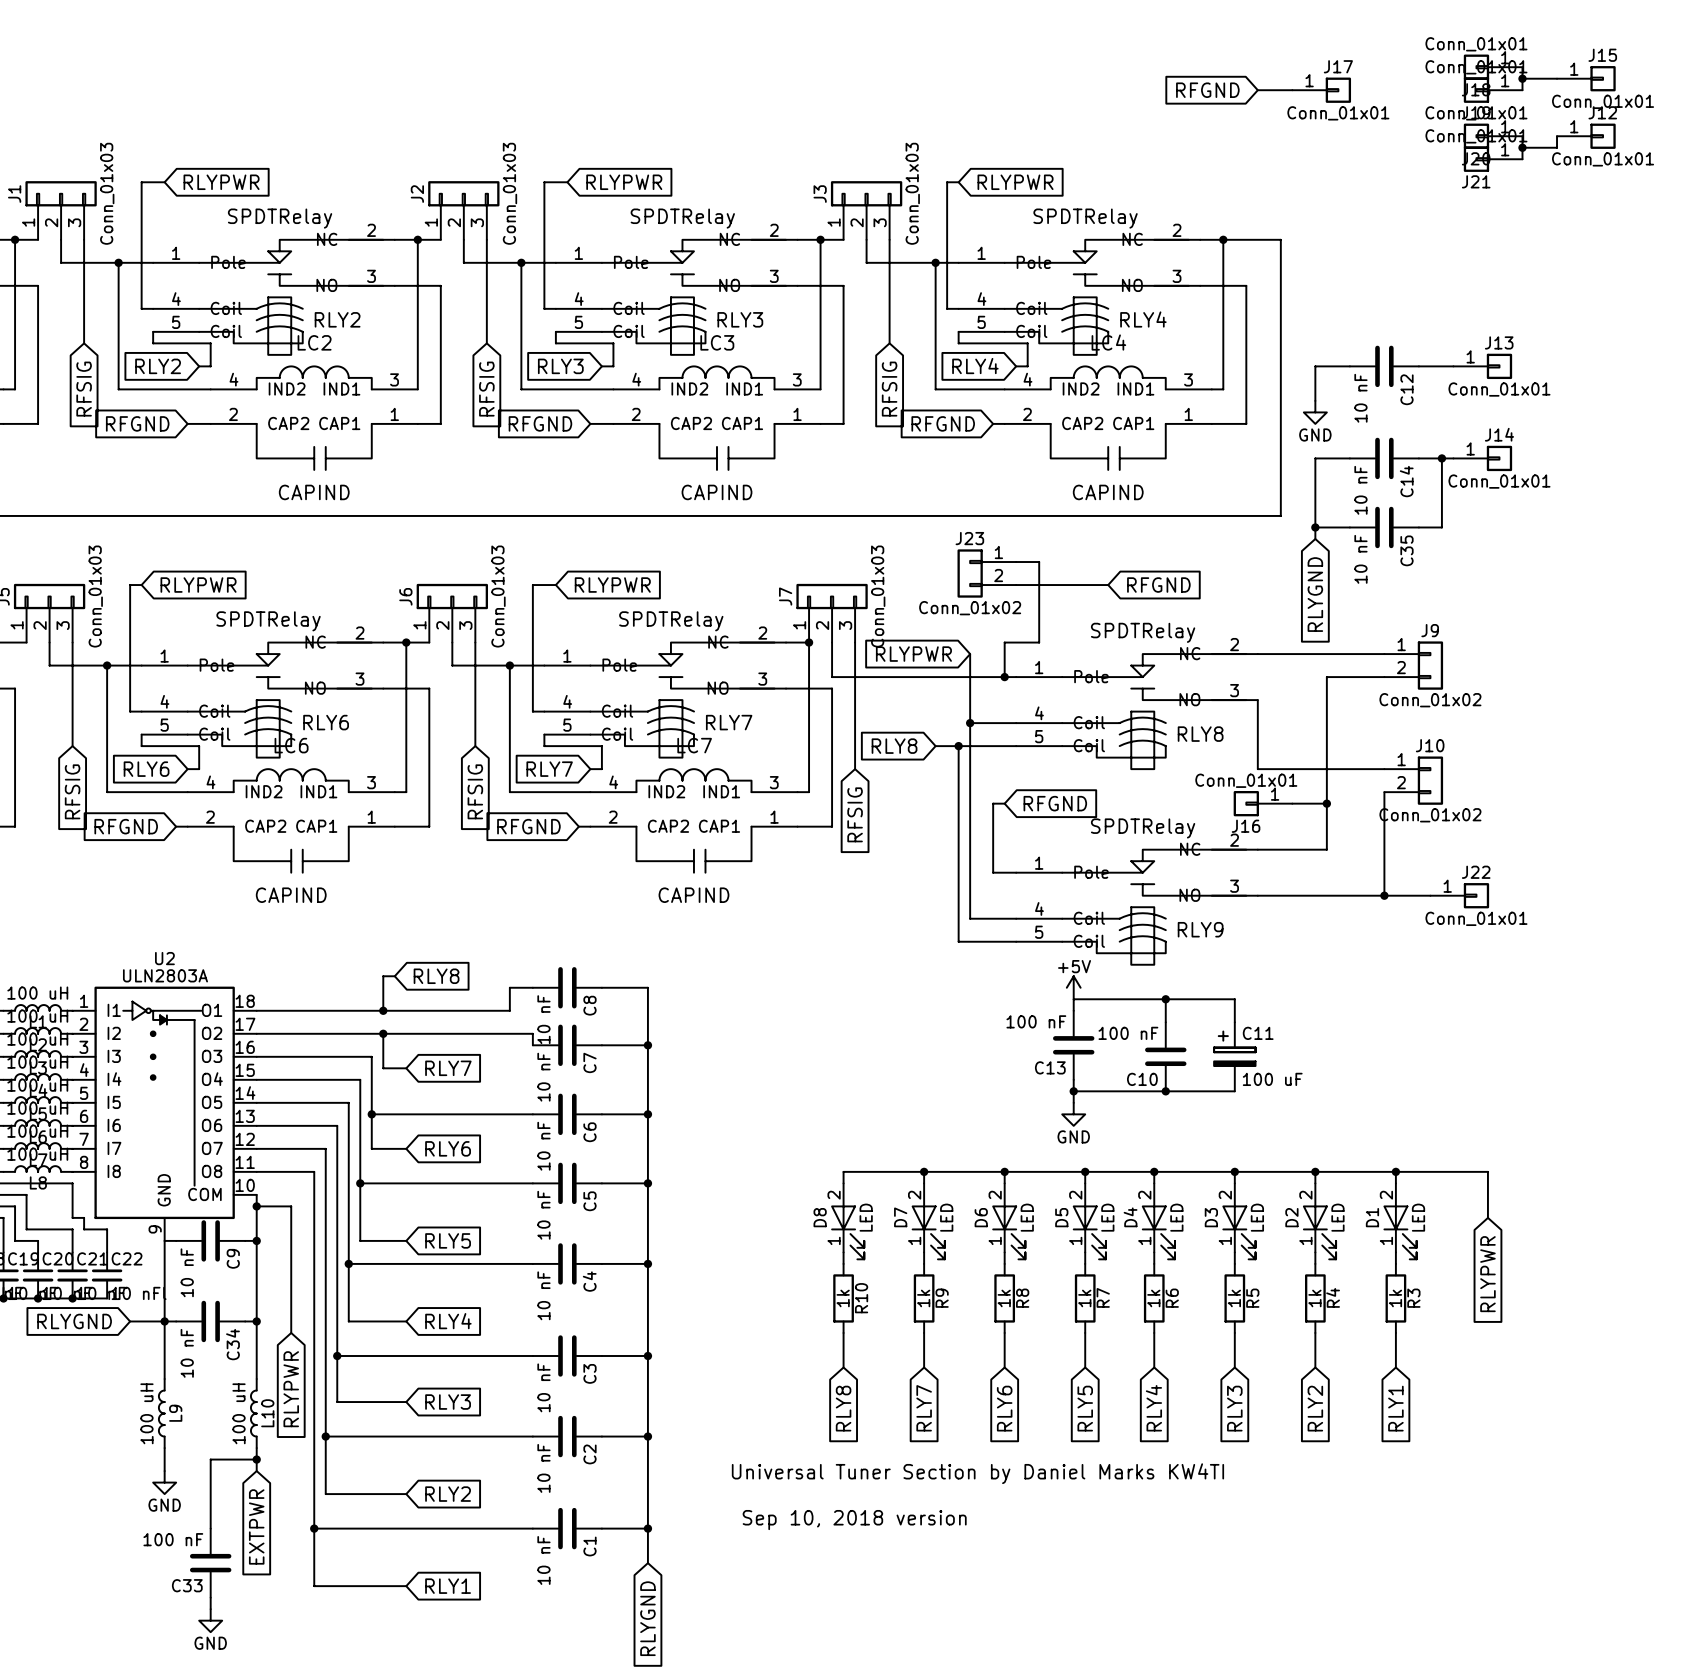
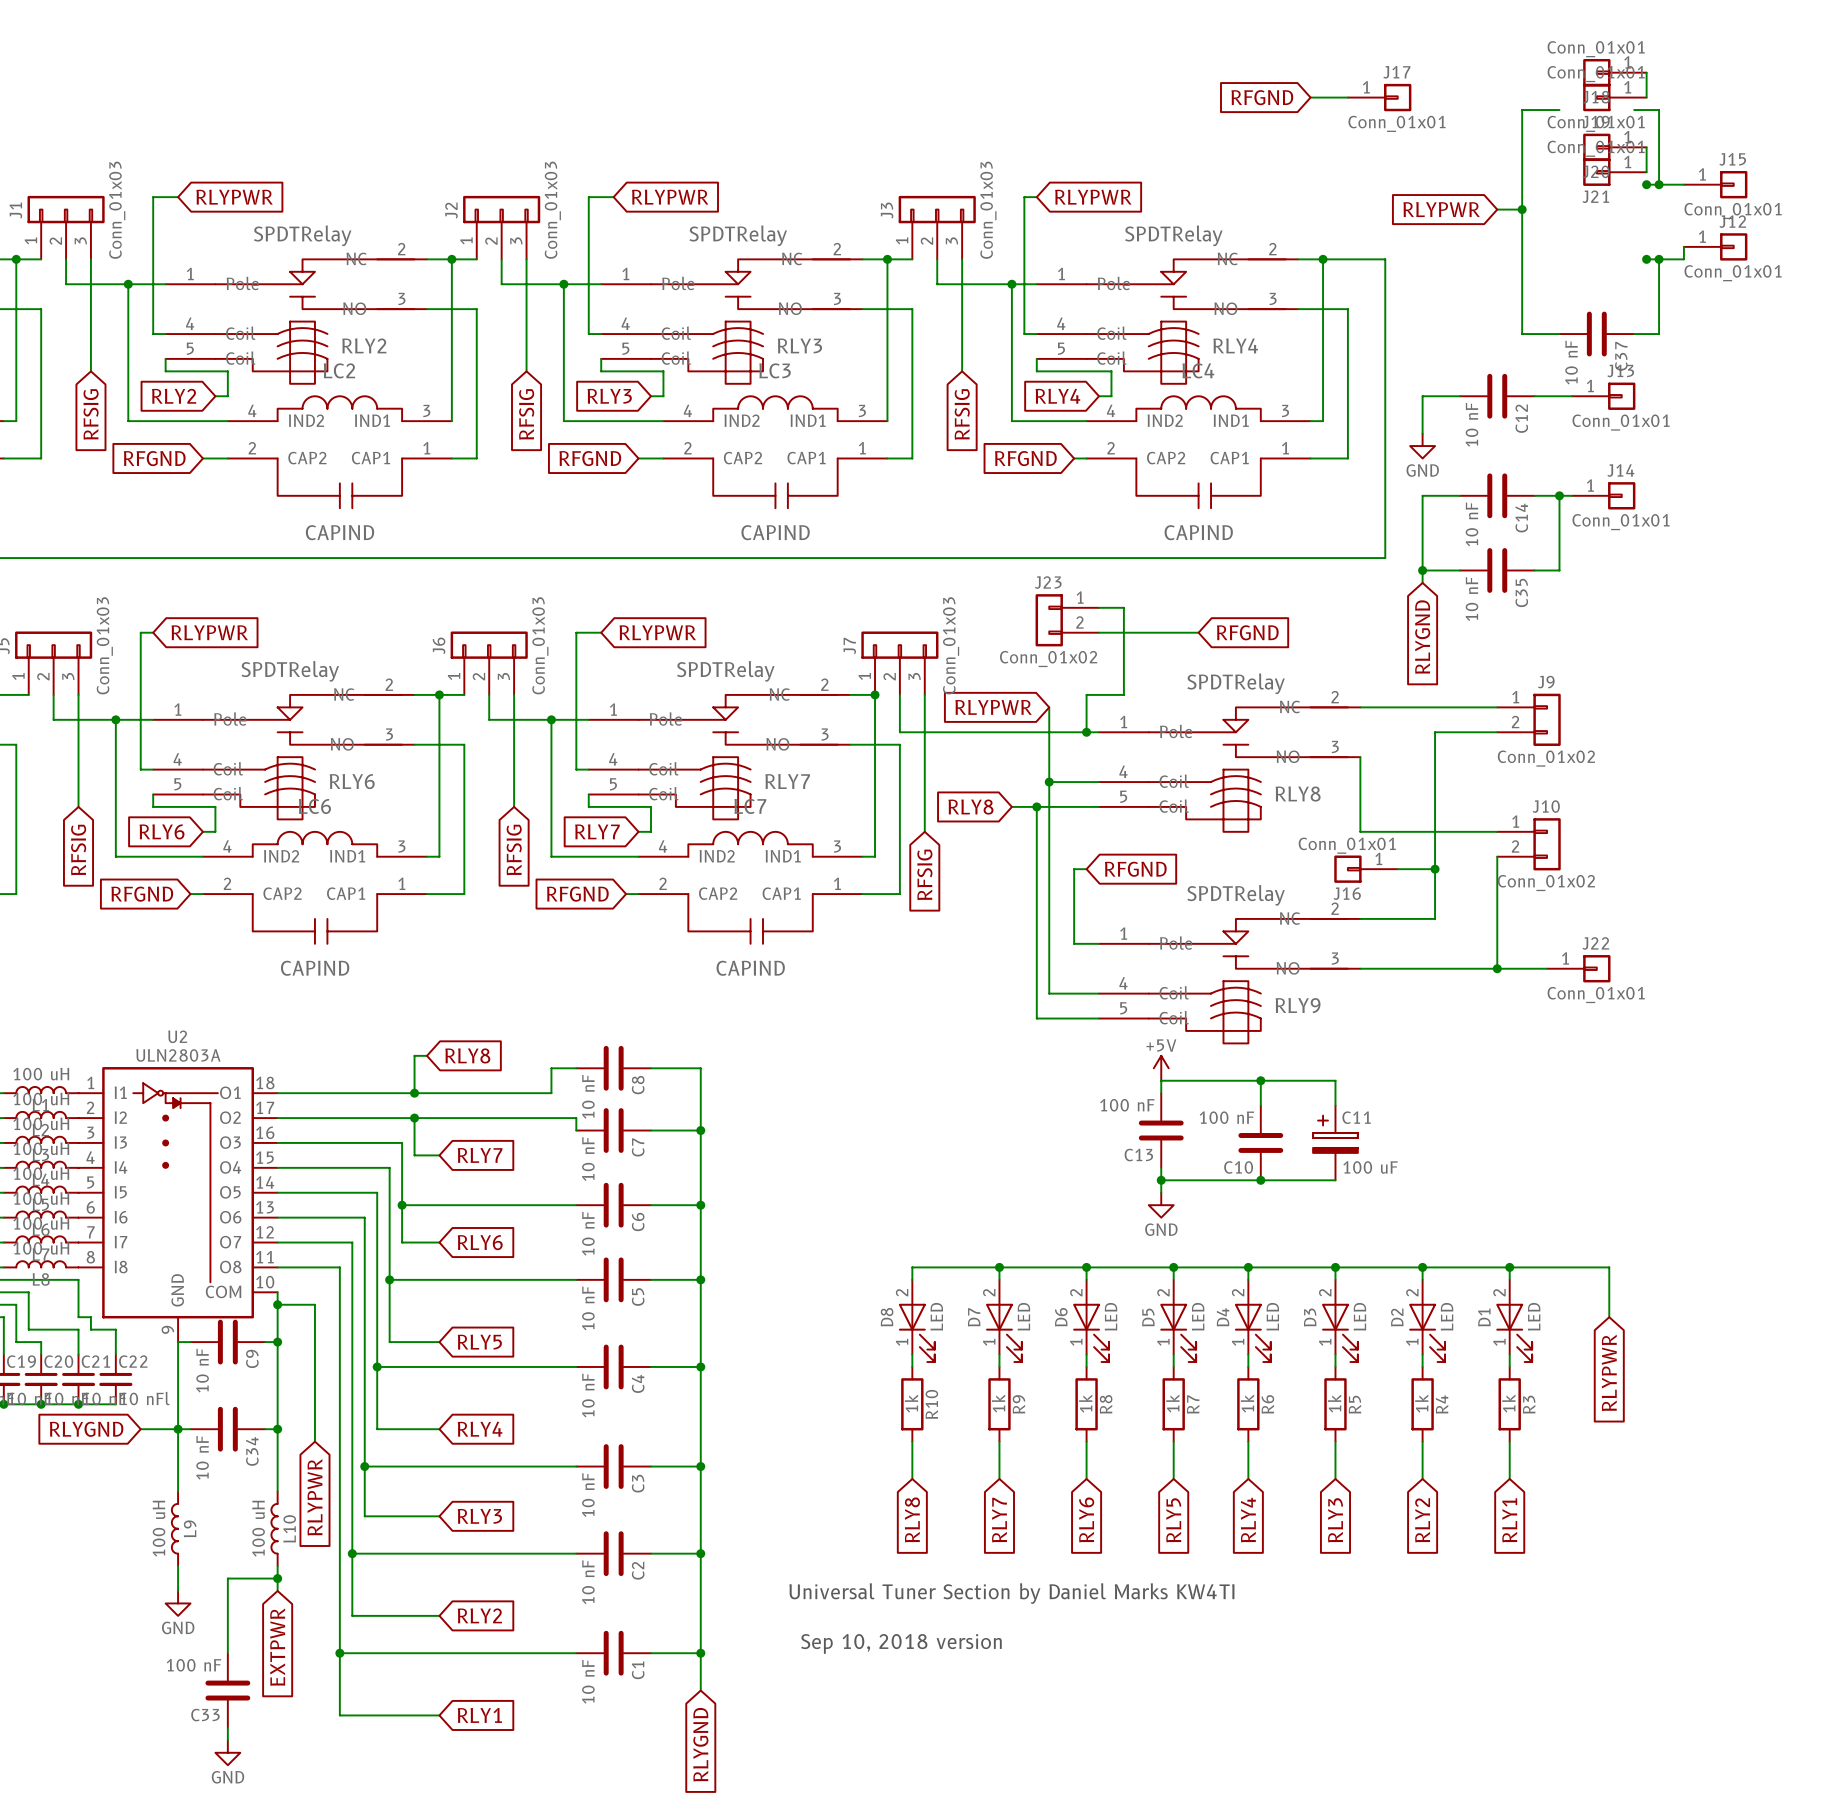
wire: (1522, 78) (1557, 78) -> (1646, 184) (1683, 184)
junction: (1522, 78) -> none
J15 position: (1586, 78) -> (1715, 184)
global label position: RFGND (1207, 90) -> RFGND (1262, 97)
J17 position: (1321, 90) -> (1379, 97)
wire: none -> (1559, 110) (1522, 110) (1522, 334) (1559, 334)
wire: none -> (1634, 110) (1659, 110) (1659, 184)
wire: (1557, 136) (1557, 147) (1522, 147) -> (1683, 246) (1683, 259) (1646, 259)
J12 position: (1586, 136) -> (1715, 246)
junction: (1522, 147) -> none
junction: none -> (1646, 184)
junction: none -> (1659, 184)
global label: none -> RLYPWR (1441, 209)
wire: none -> (1497, 209) (1522, 209)
junction: none -> (1522, 209)
junction: none -> (1646, 259)
wire: none -> (1659, 259) (1659, 334) (1634, 334)
junction: none -> (1659, 259)
C37: none -> 10 nF (1596, 334)

